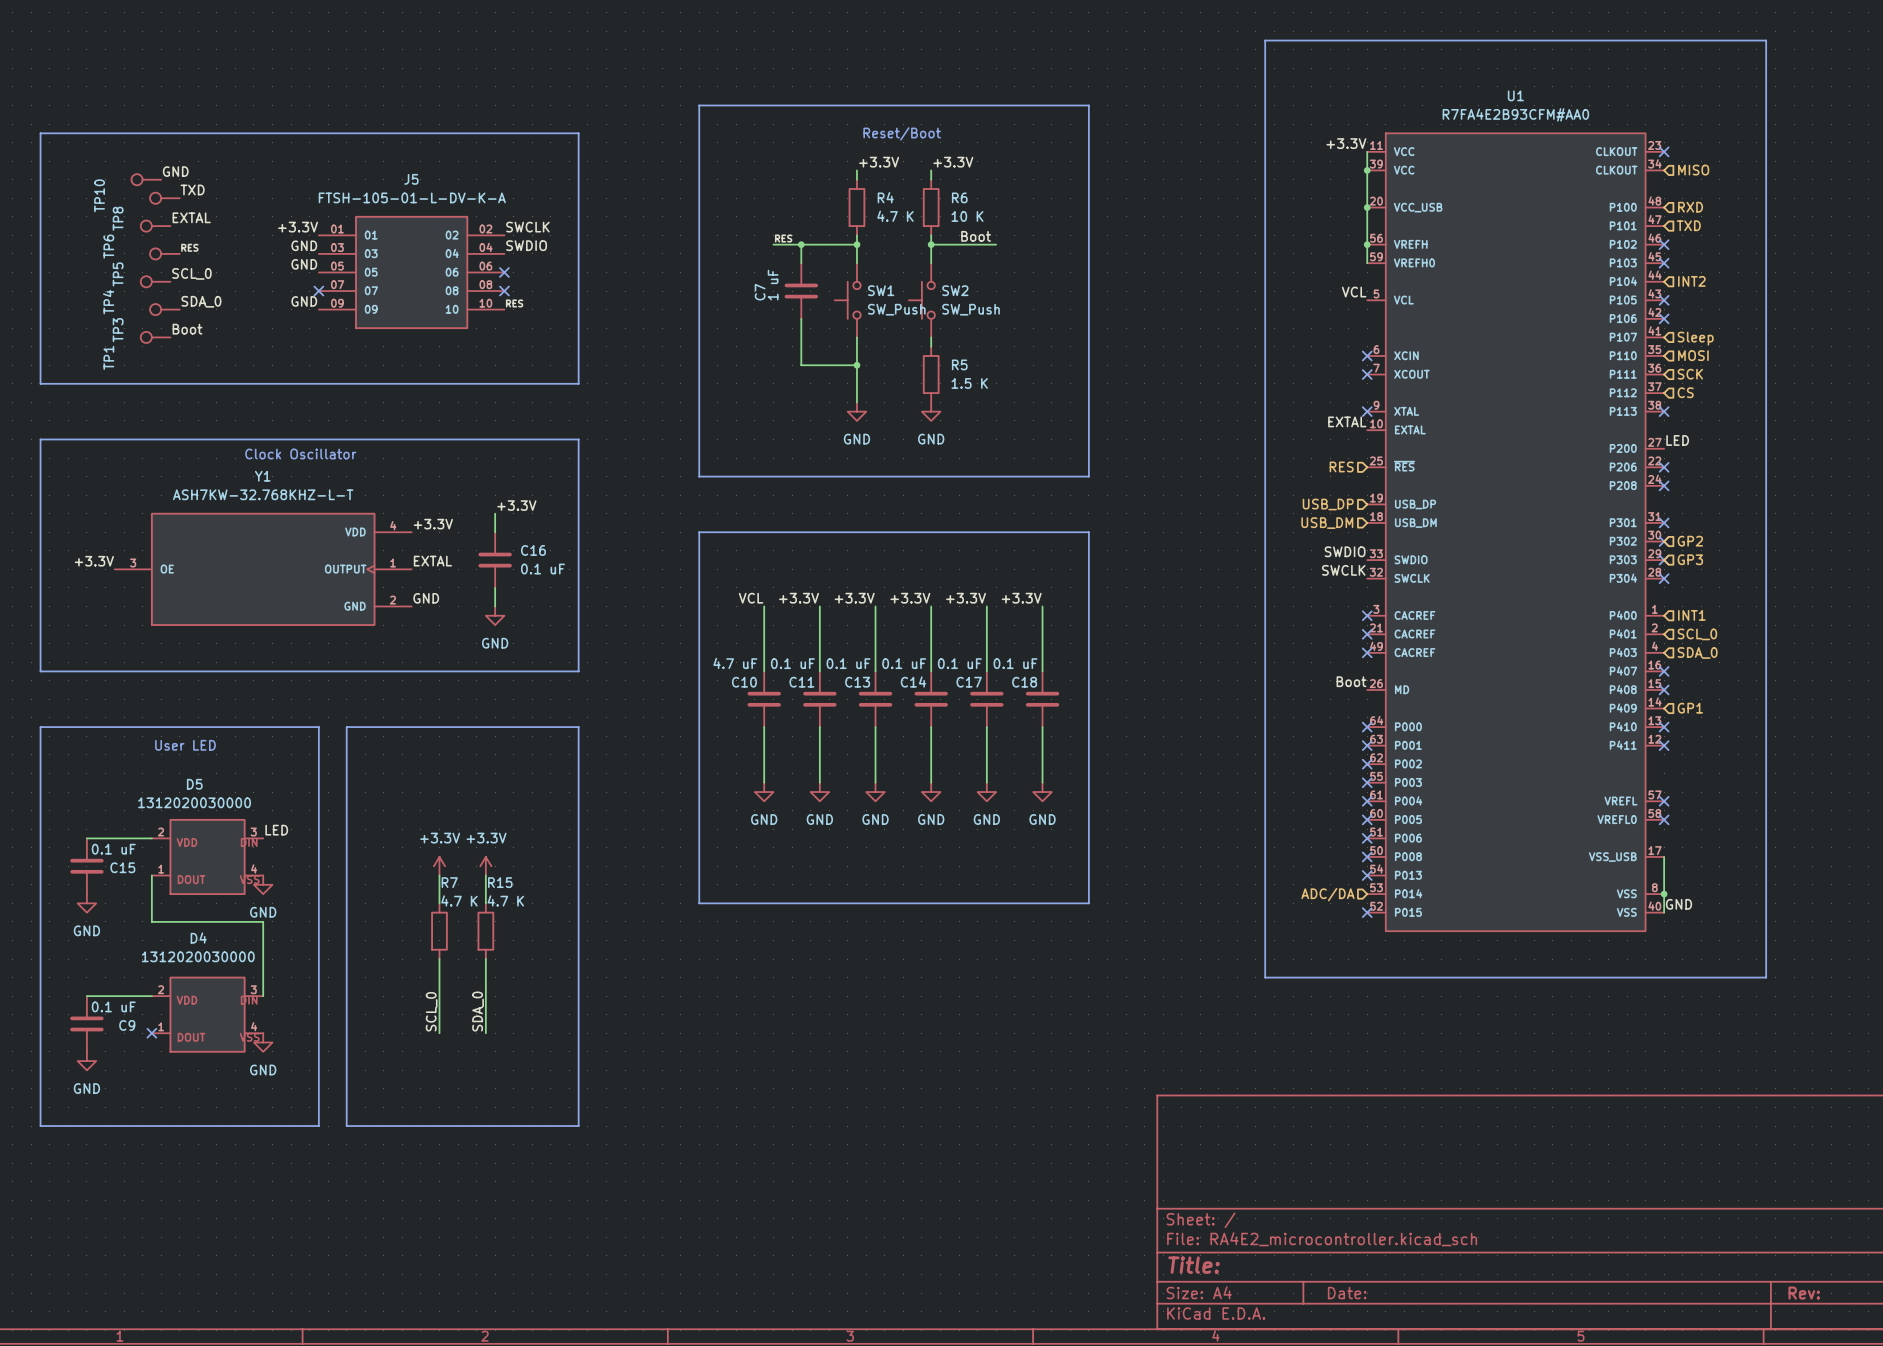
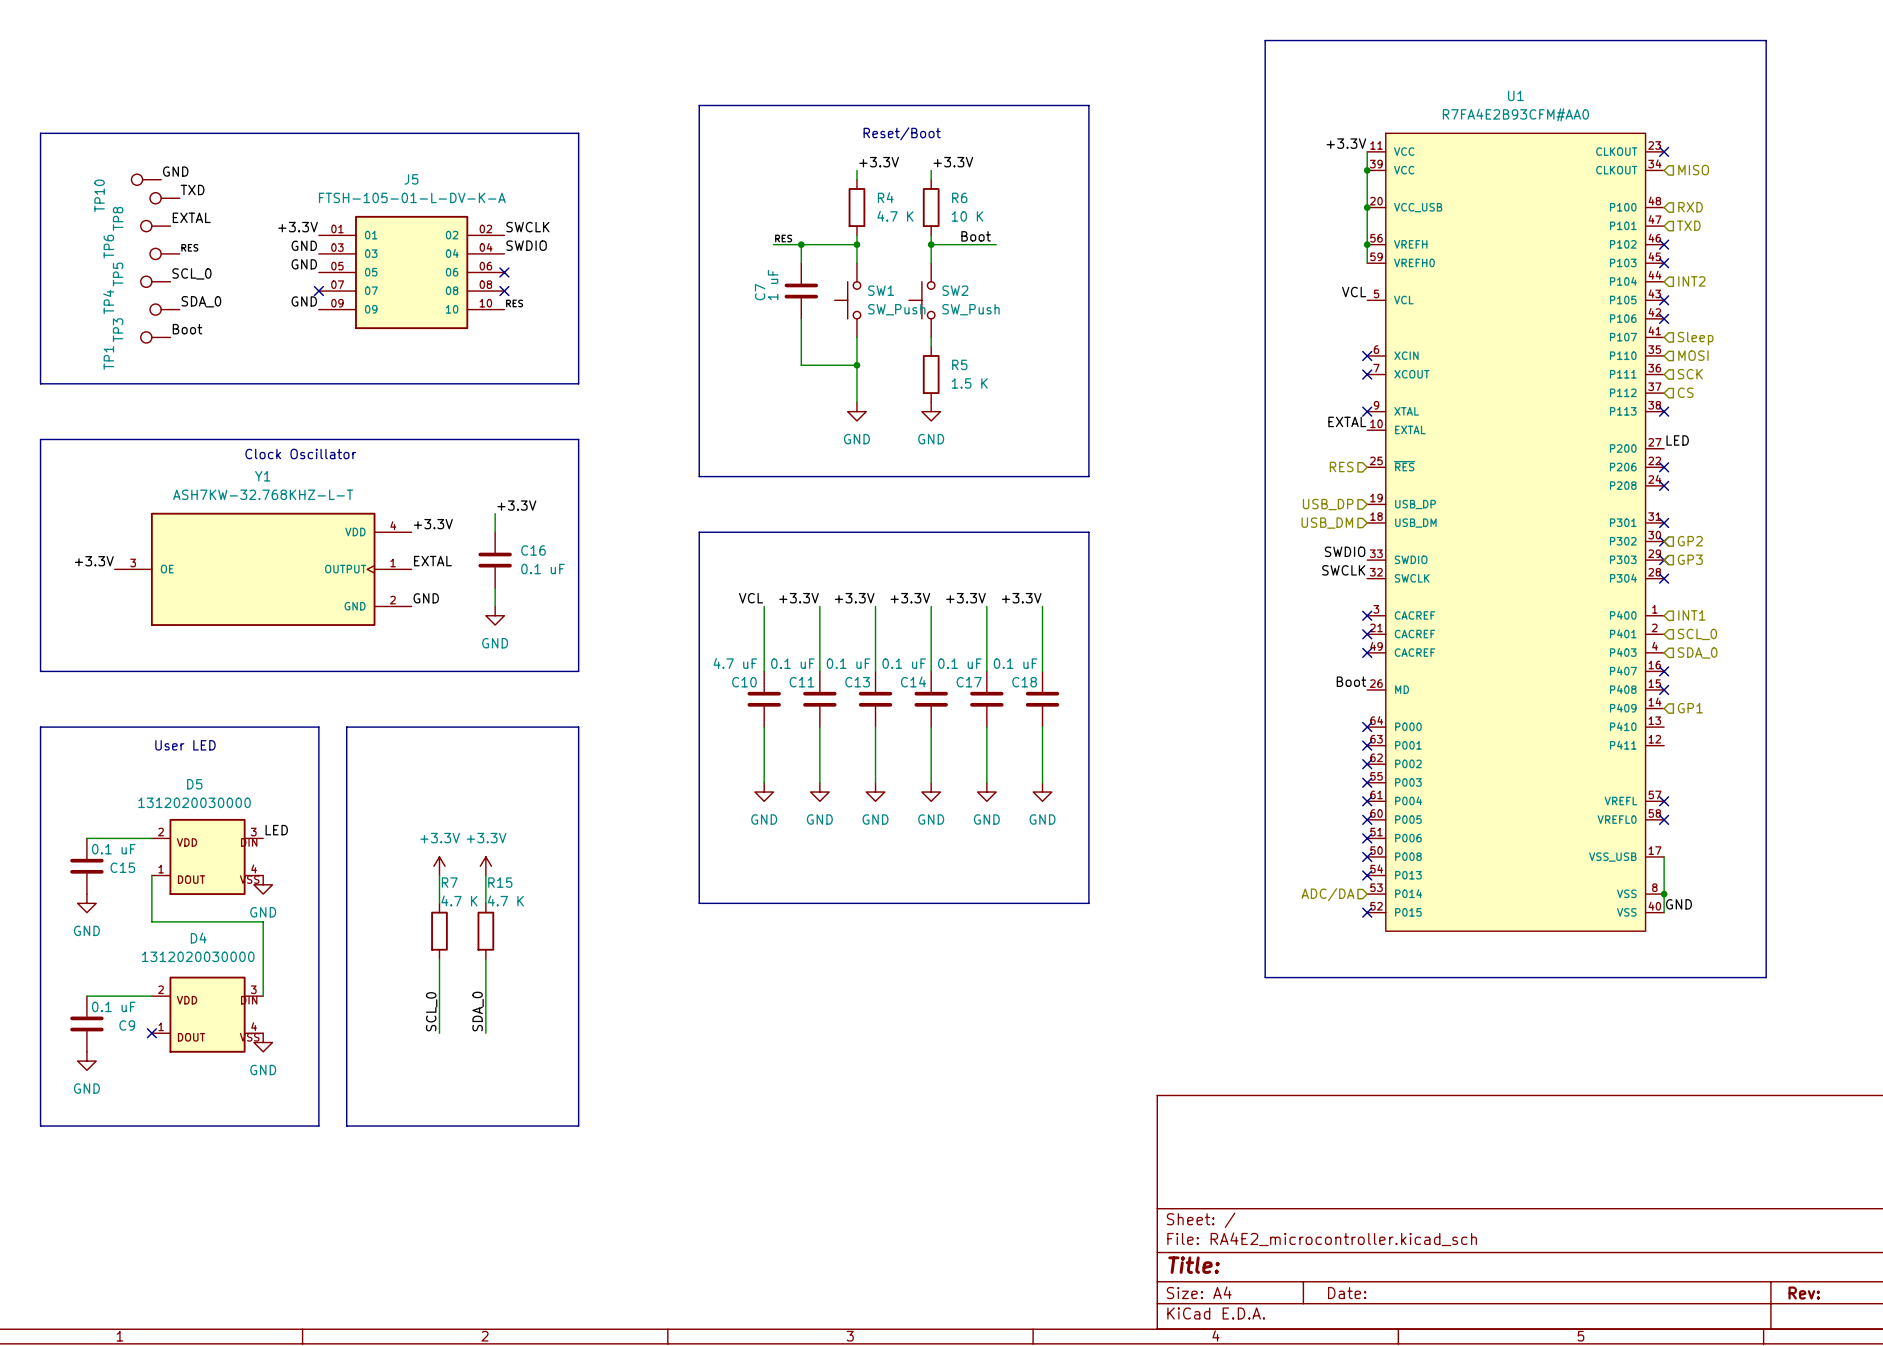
no-connect mark: (1664, 727) -> none
no-connect mark: (1664, 745) -> none

